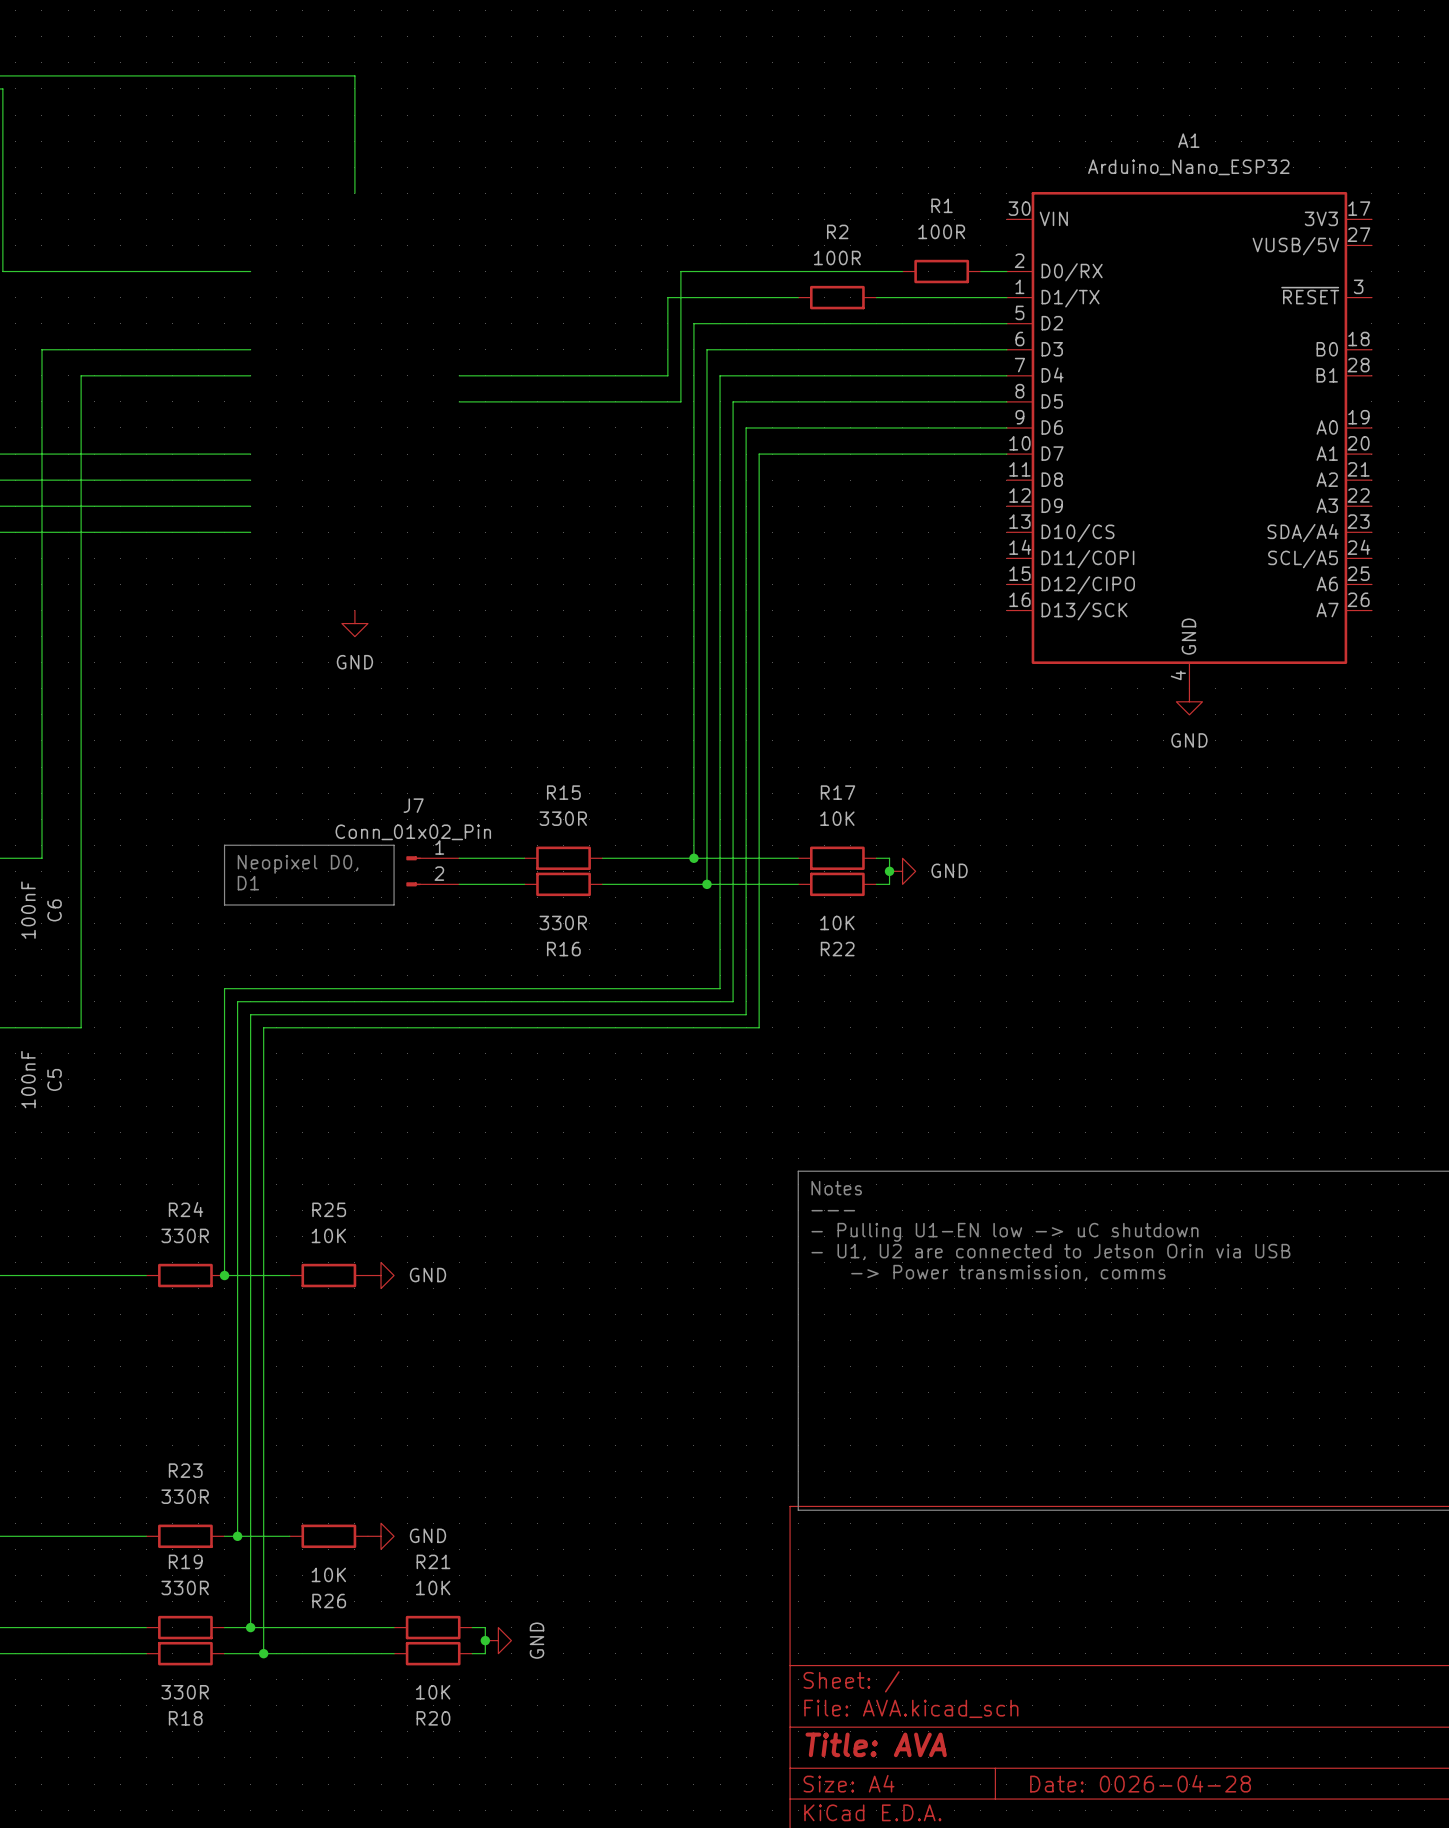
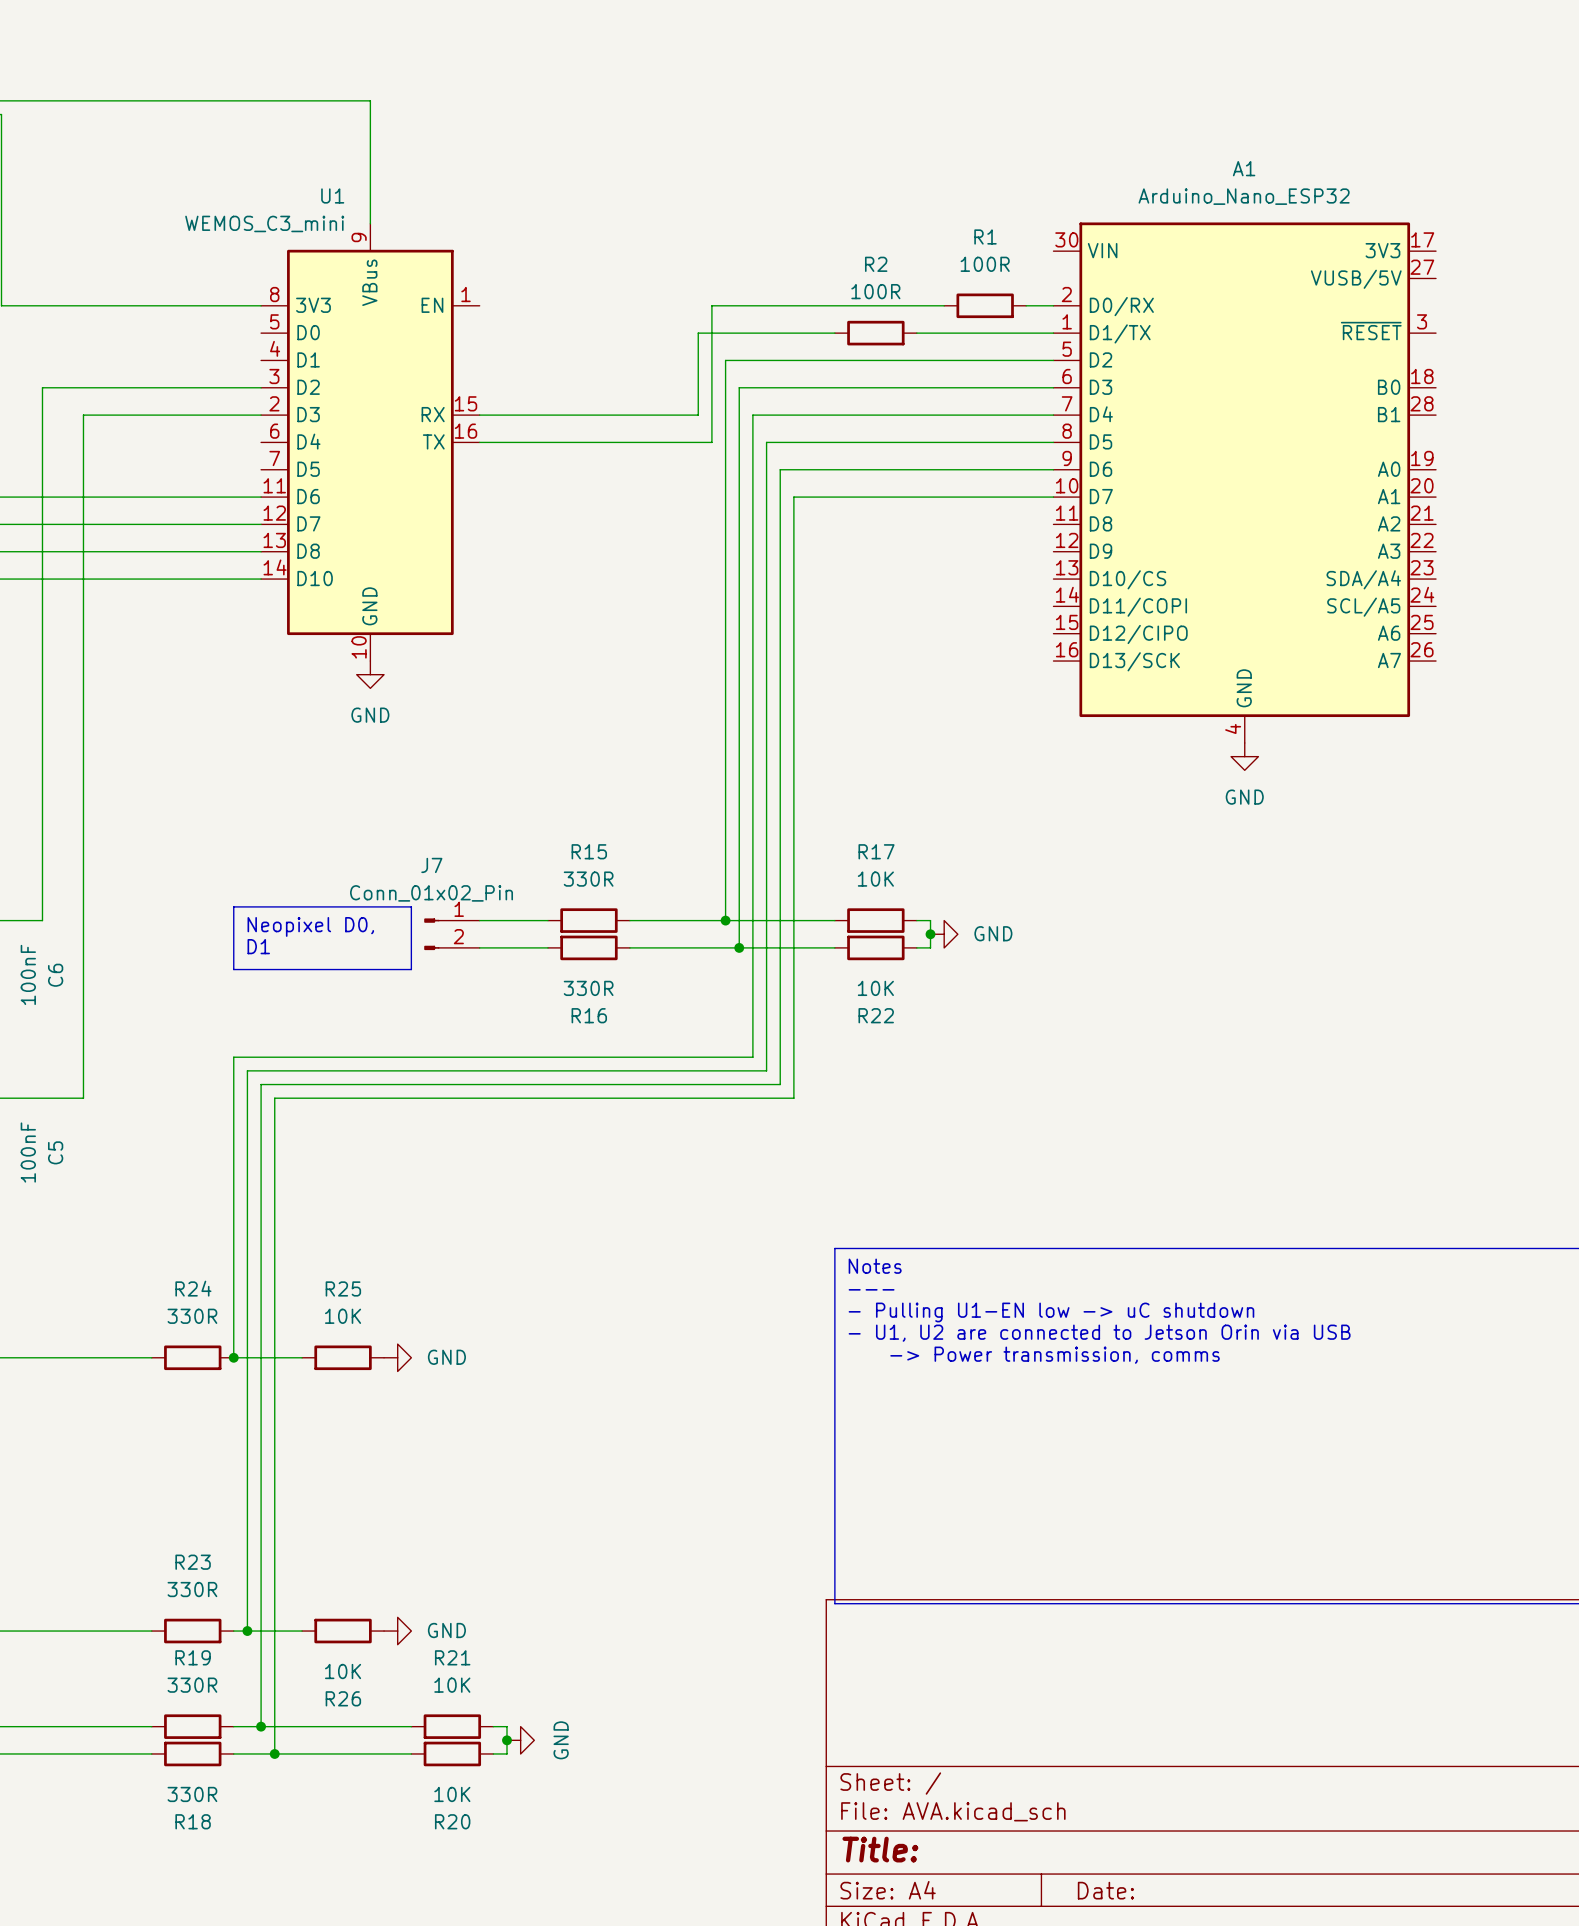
U1: none -> WEMOS_C3_mini (370, 442)
title block: Title: AVA (876, 1744) -> Title: (880, 1849)
title block: Date: 0026-04-28 (1140, 1783) -> Date: (1105, 1890)

